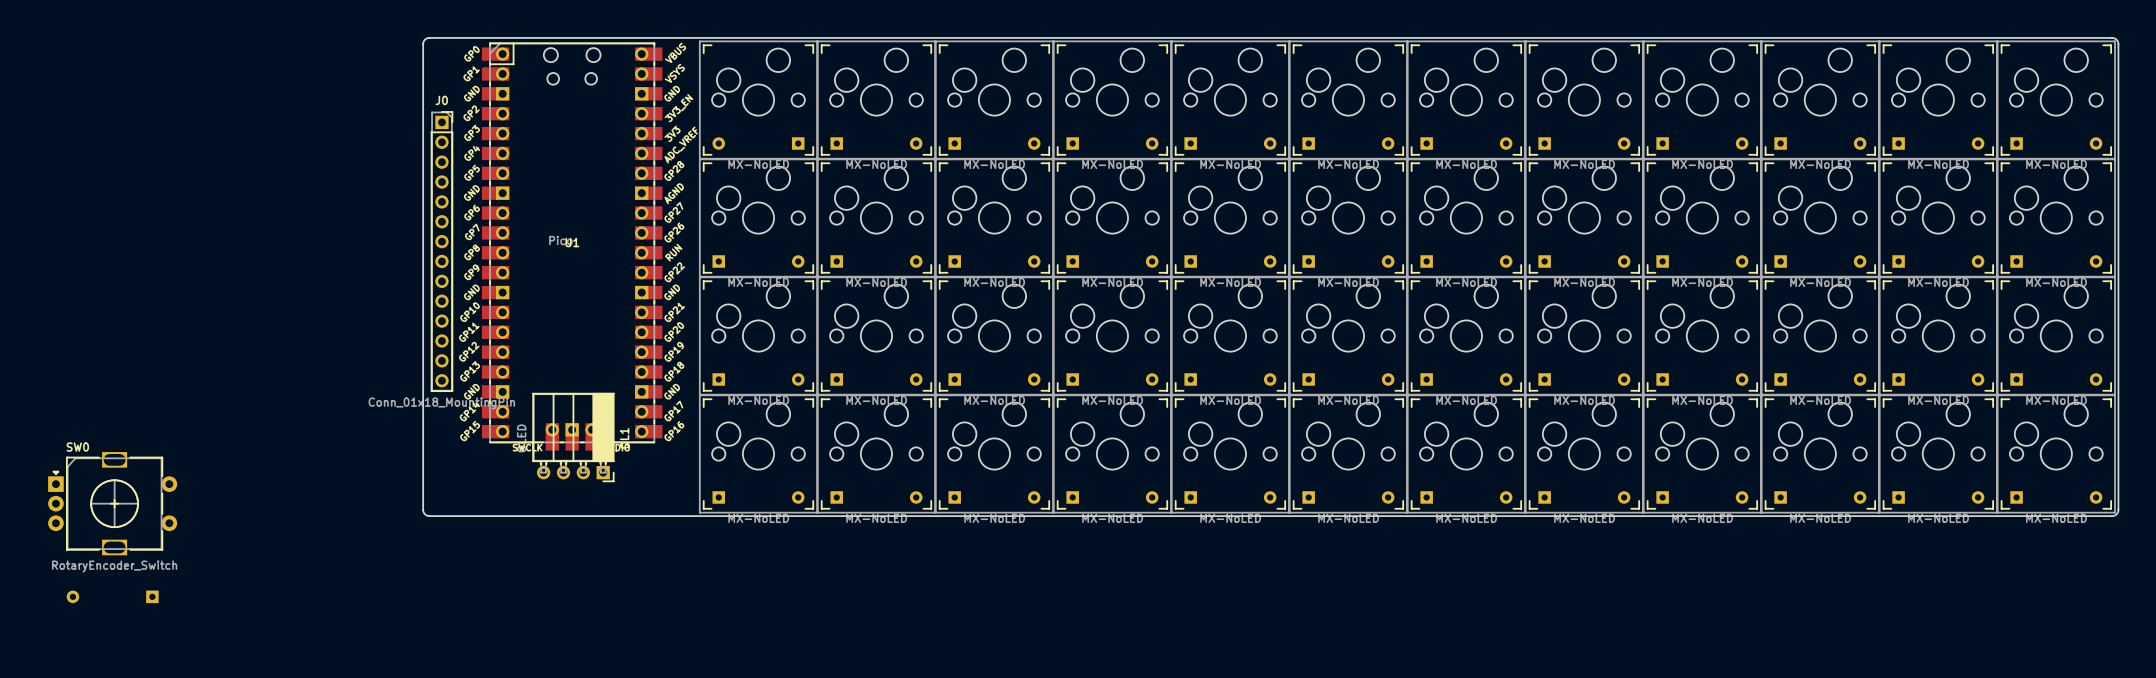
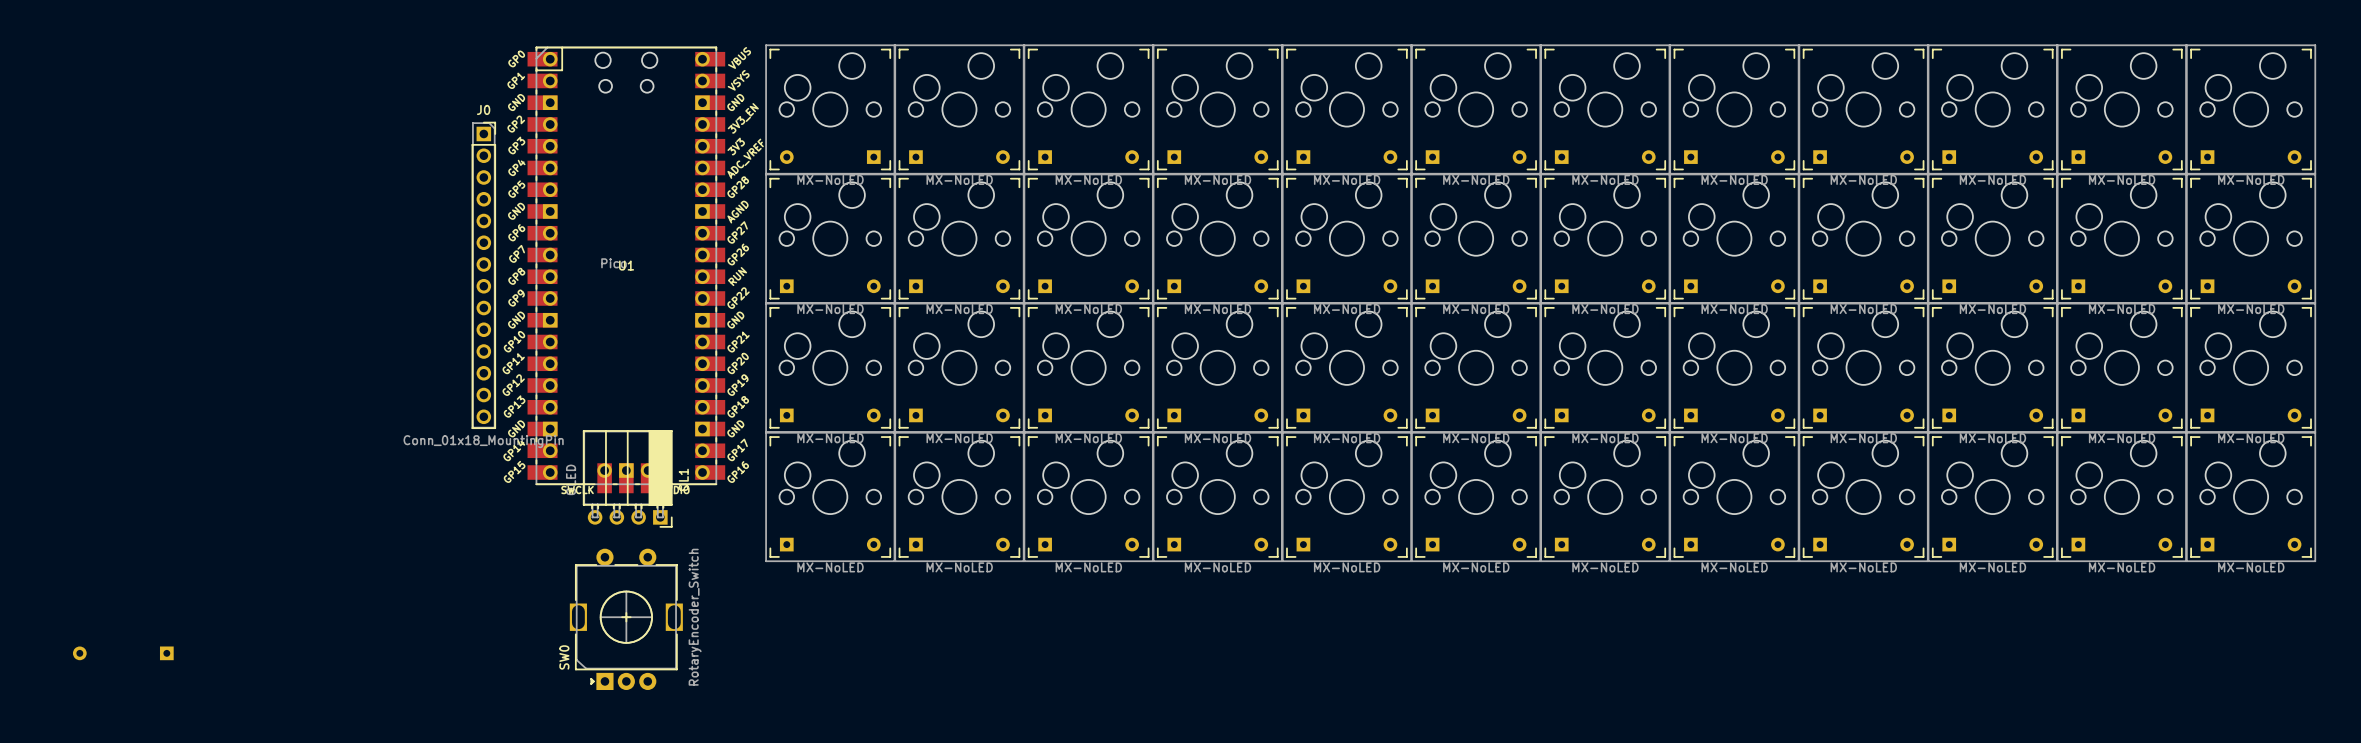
board edge: (429, 37) (2113, 38) (2118, 44) (2118, 511) (2112, 516) (427, 515) (423, 509) (423, 44) (424, 39) (429, 37) -> none
SW0 rotation: 0° (112, 503) -> 90° counterclockwise (626, 619)
SW0 position: (112, 503) -> (626, 619)

